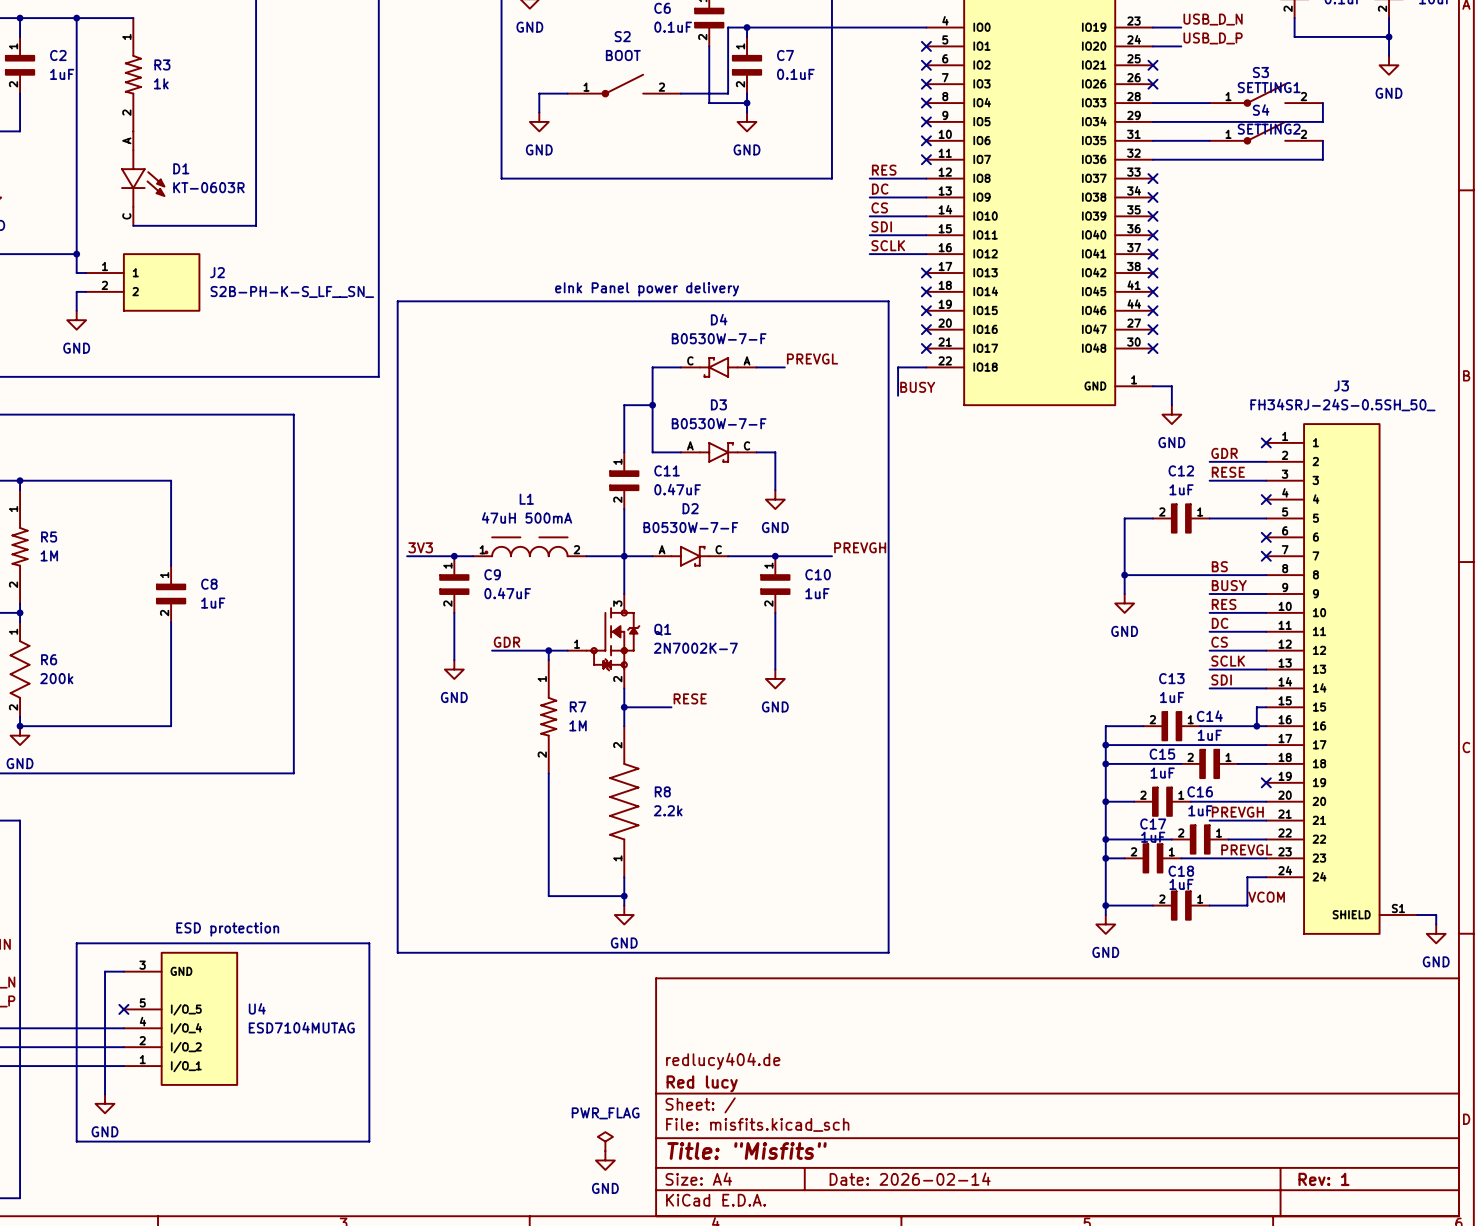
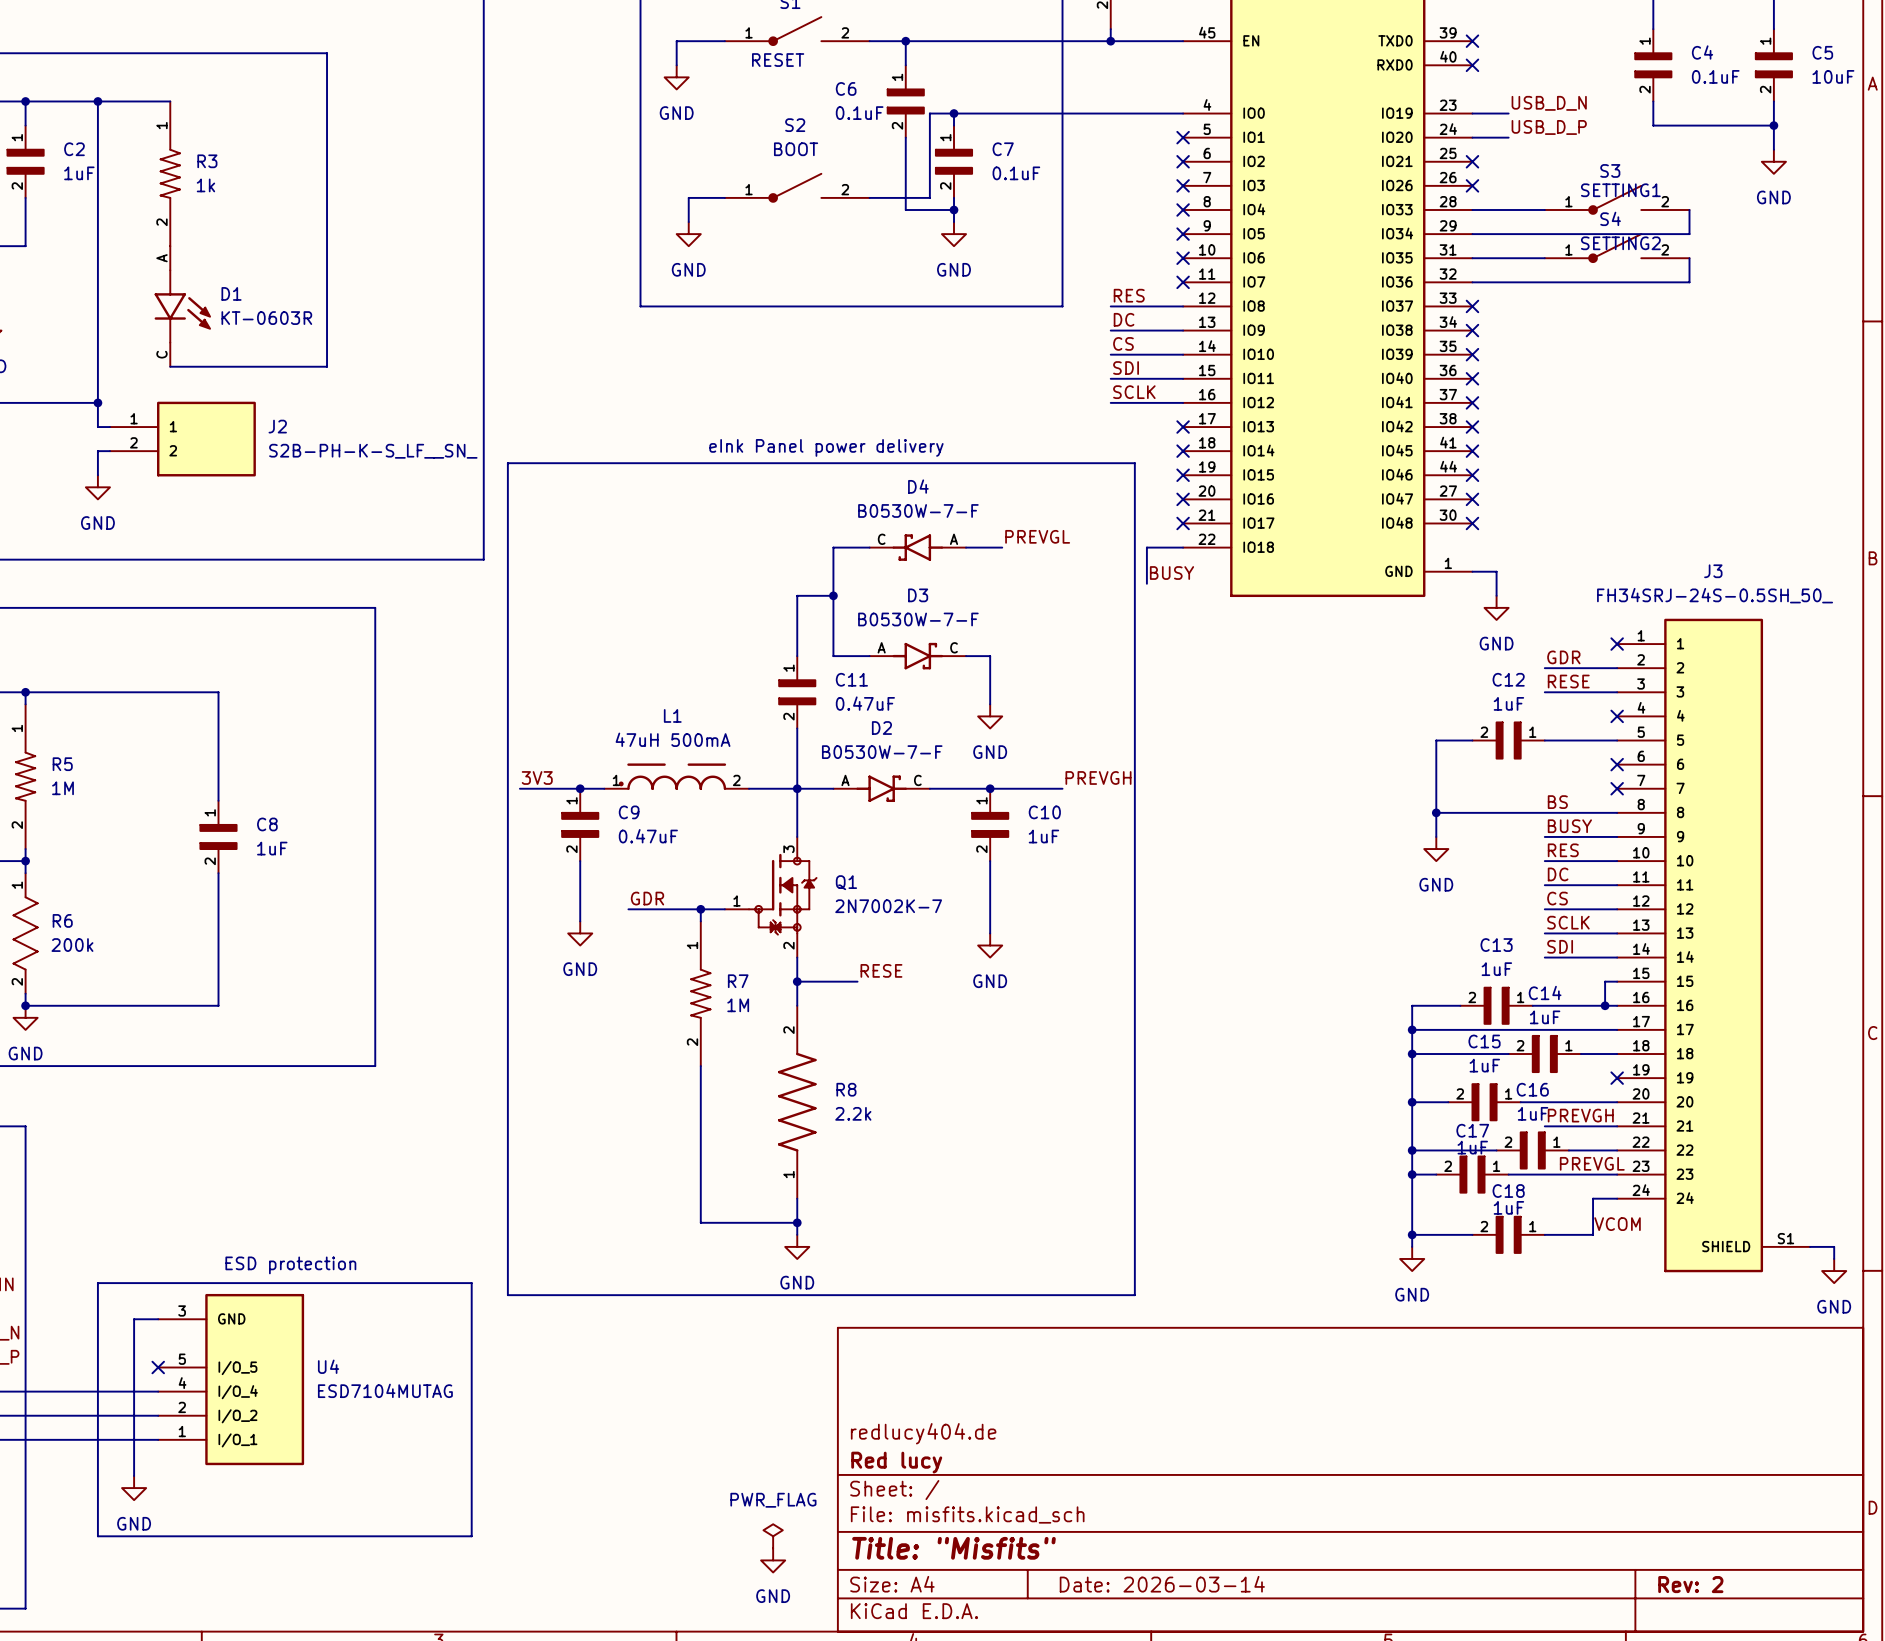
title block: Date: 2026-02-14 (910, 1179) -> Date: 2026-03-14 (1162, 1584)
title block: Rev: 1 (1323, 1179) -> Rev: 2 (1690, 1584)

